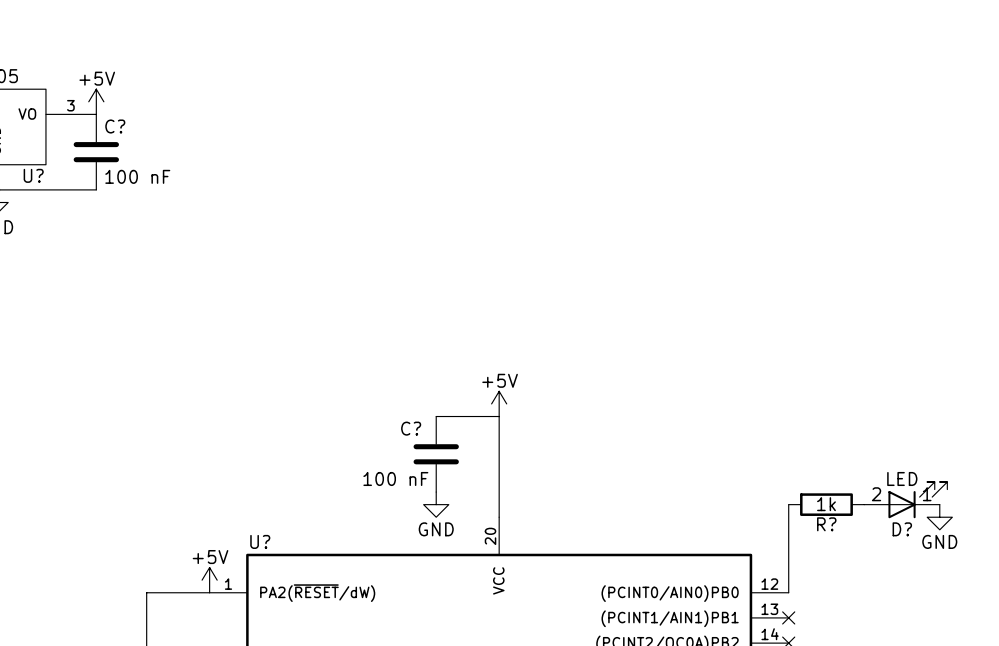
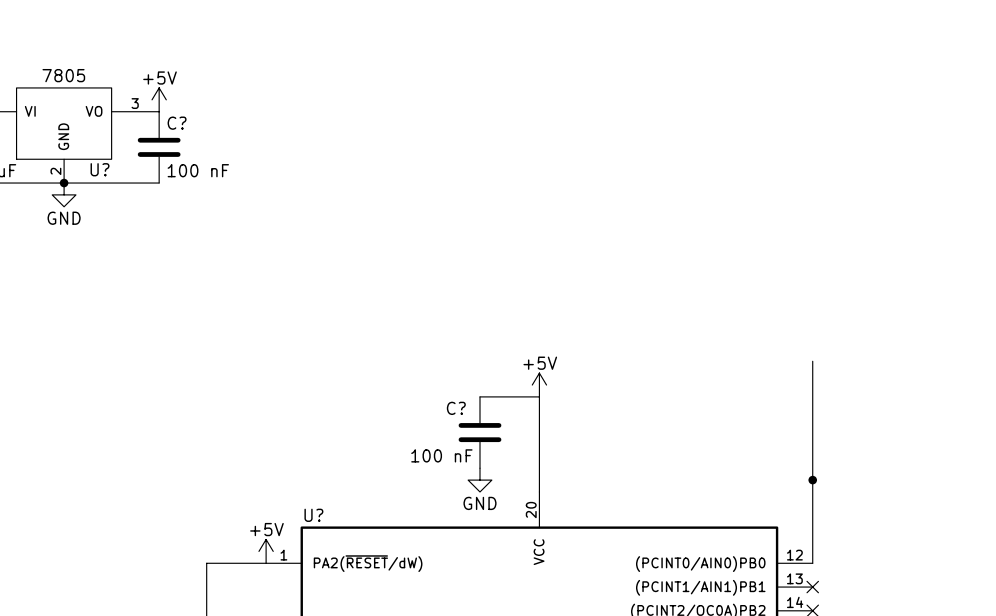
wire: none -> (812, 361) (812, 480)
D?: LED (905, 500) -> none
junction: none -> (812, 480)
R?: 1k (826, 504) -> none
power symbol: GND (939, 517) -> none

